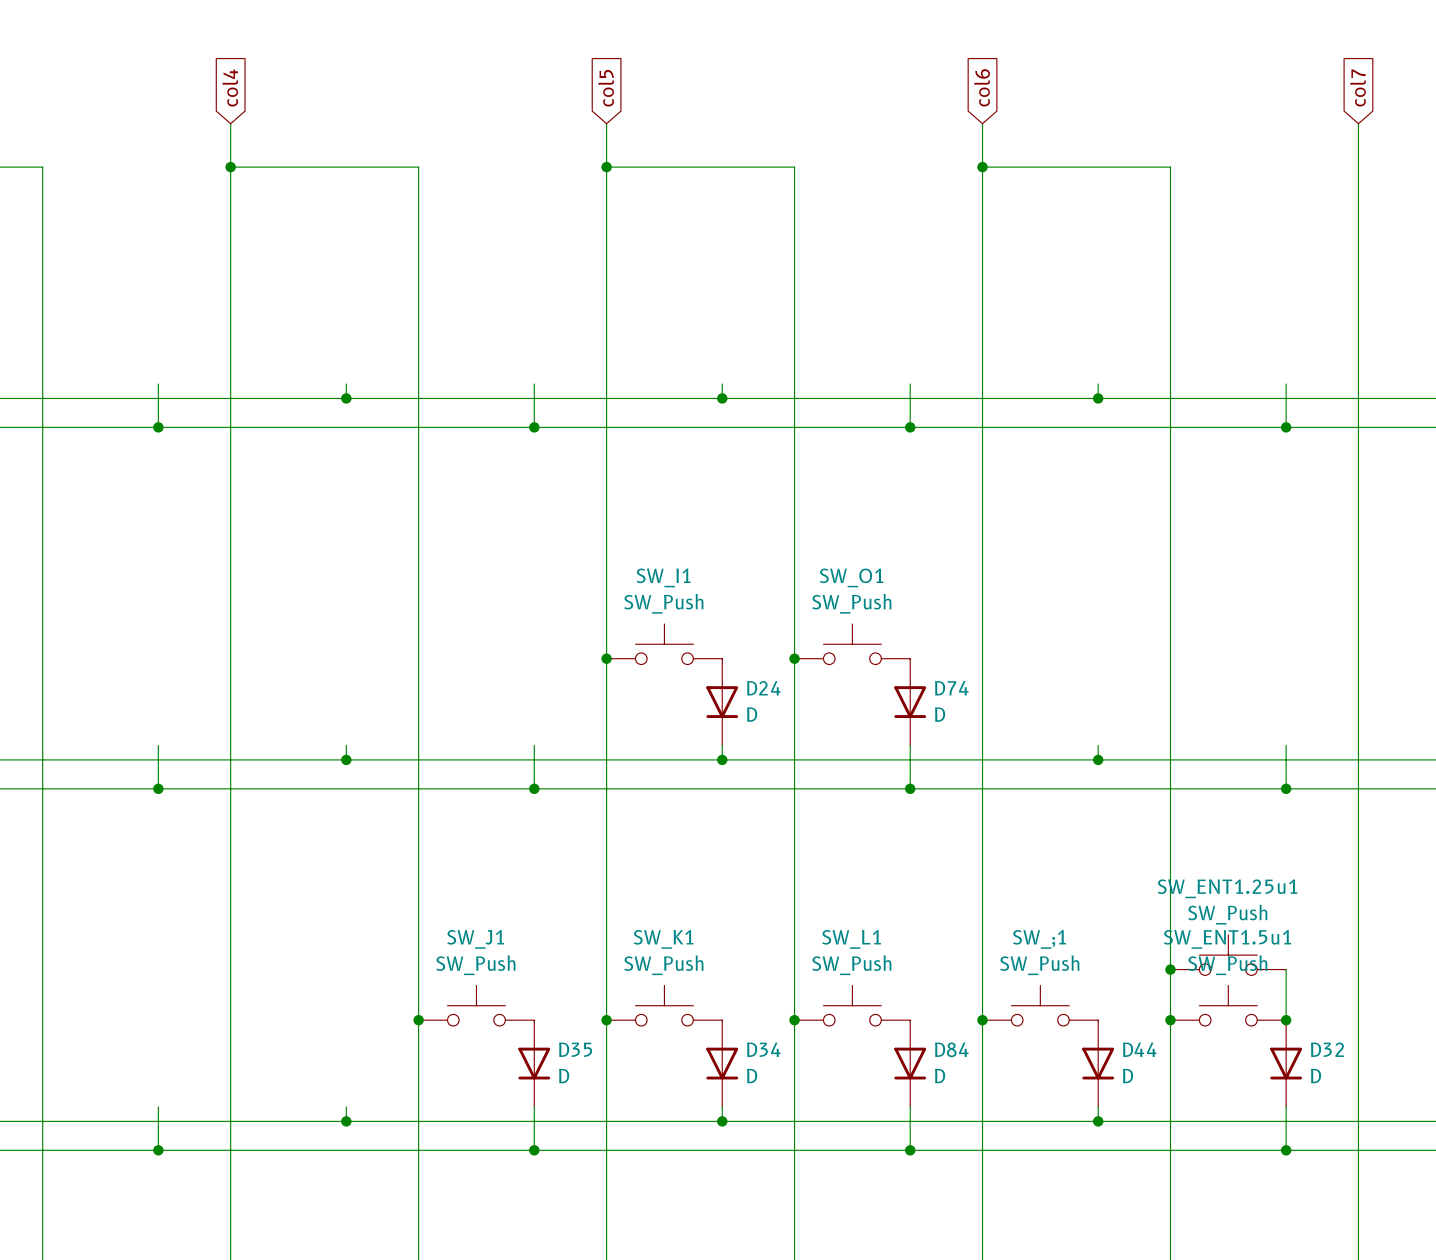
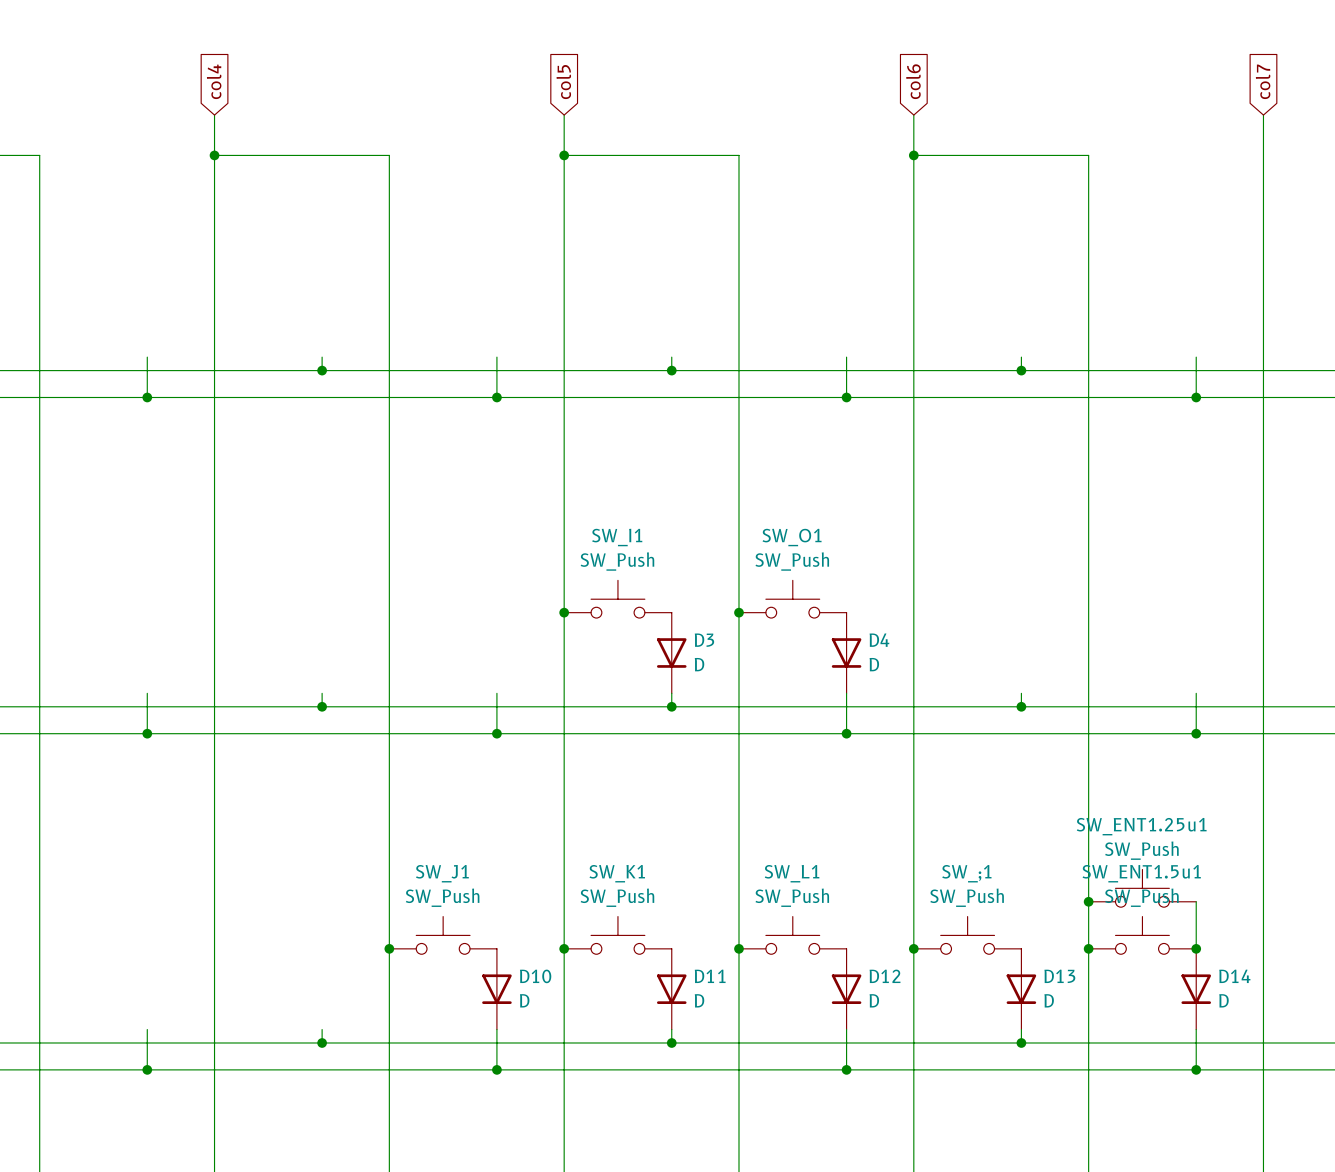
D24 name: D24 (763, 688) -> D3 (704, 640)
D74 name: D74 (951, 688) -> D4 (879, 640)
D35 name: D35 (575, 1049) -> D10 (535, 976)
D34 name: D34 (763, 1049) -> D11 (710, 976)
D84 name: D84 (951, 1049) -> D12 (885, 976)
D44 name: D44 (1139, 1049) -> D13 (1059, 976)
D32 name: D32 (1327, 1049) -> D14 (1234, 976)

